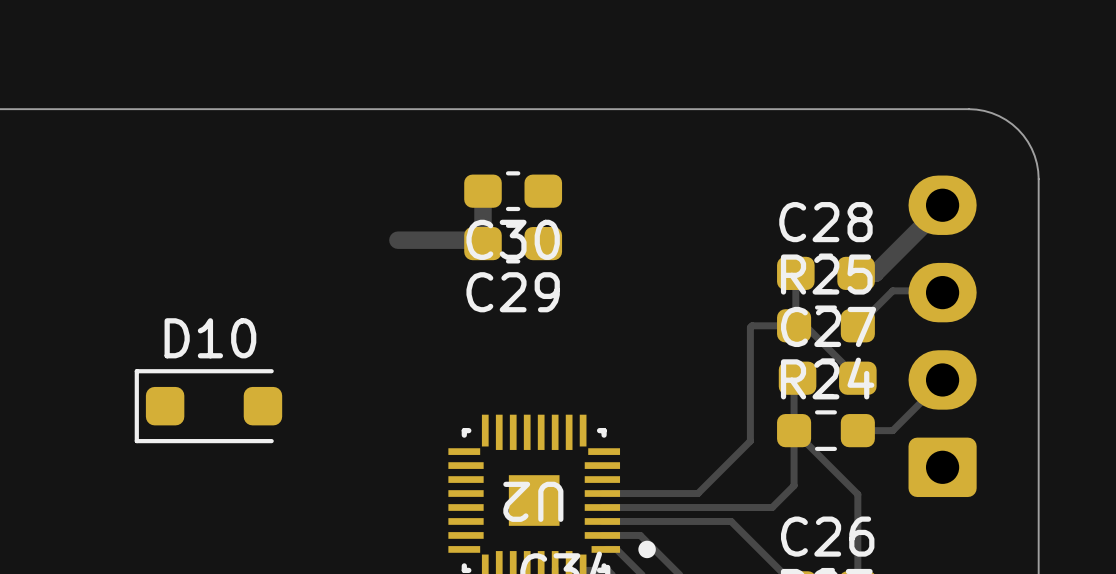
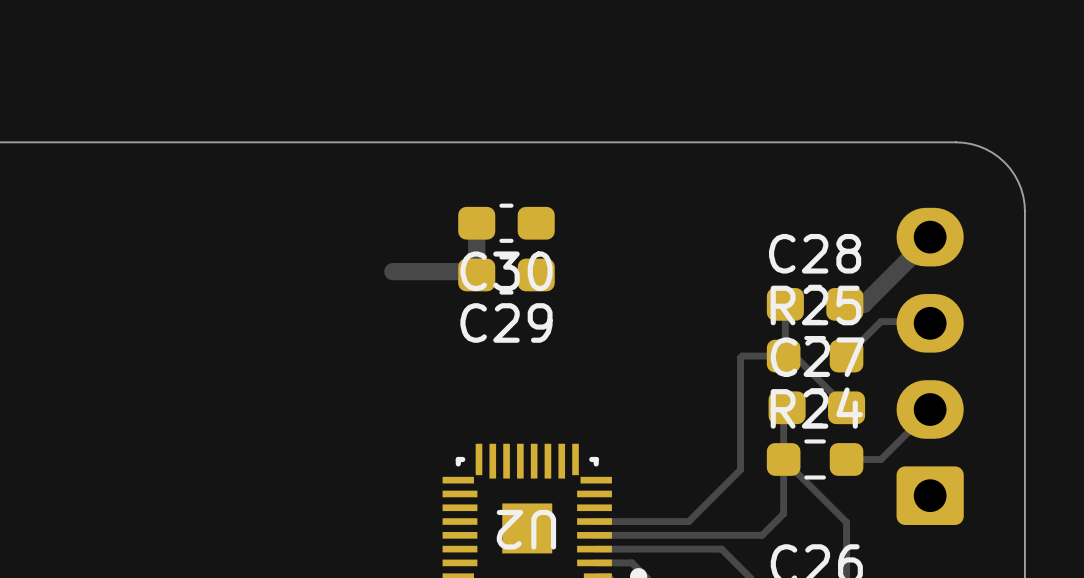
D10: (208, 406) -> none

